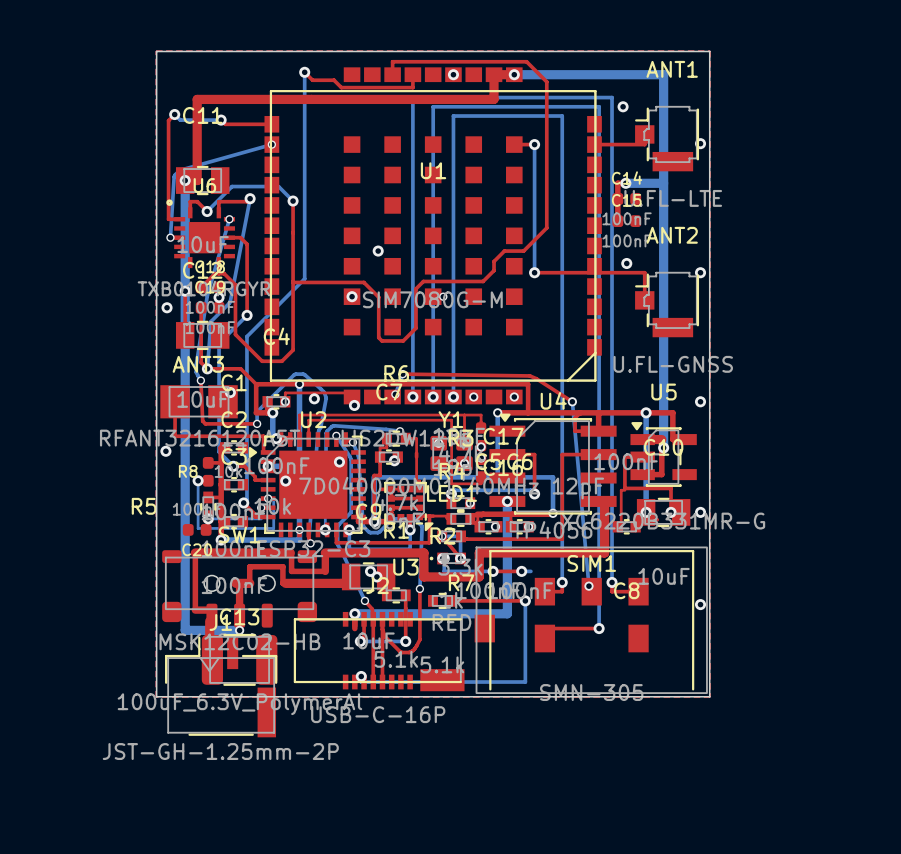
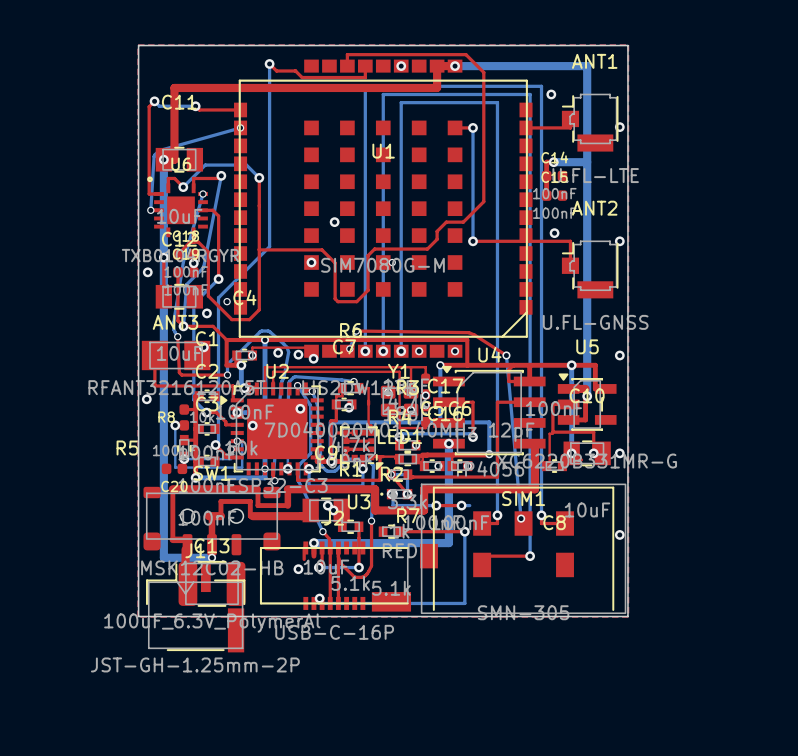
via: none -> (227, 301)
via: none -> (206, 313)
via: none -> (298, 354)
top track: none -> (304, 547) (304, 559)
via: none -> (298, 569)

